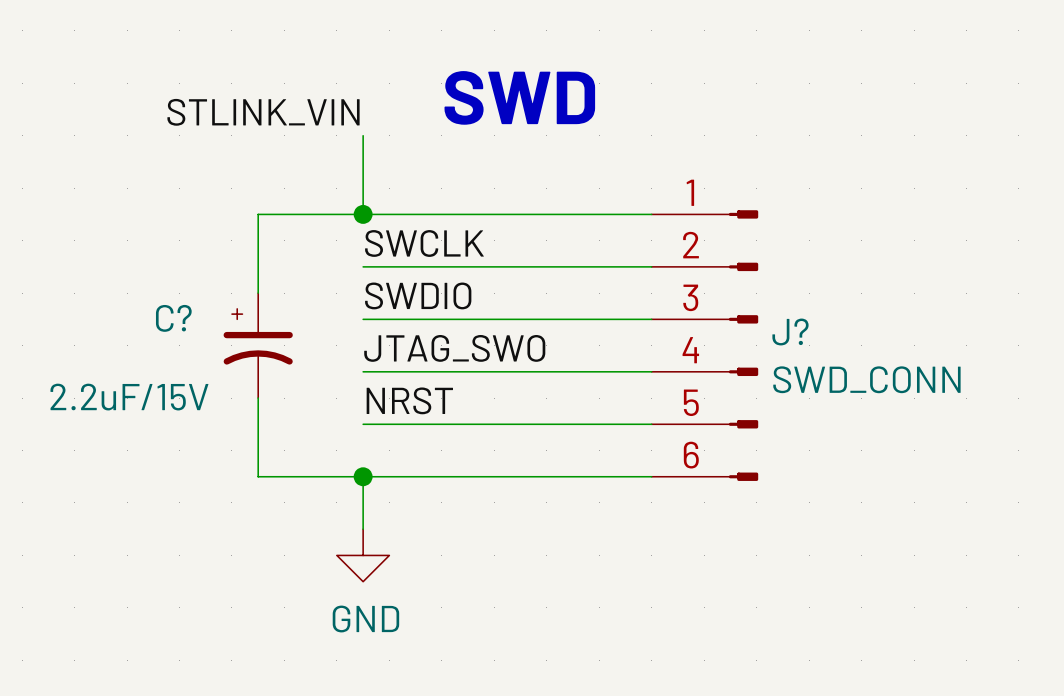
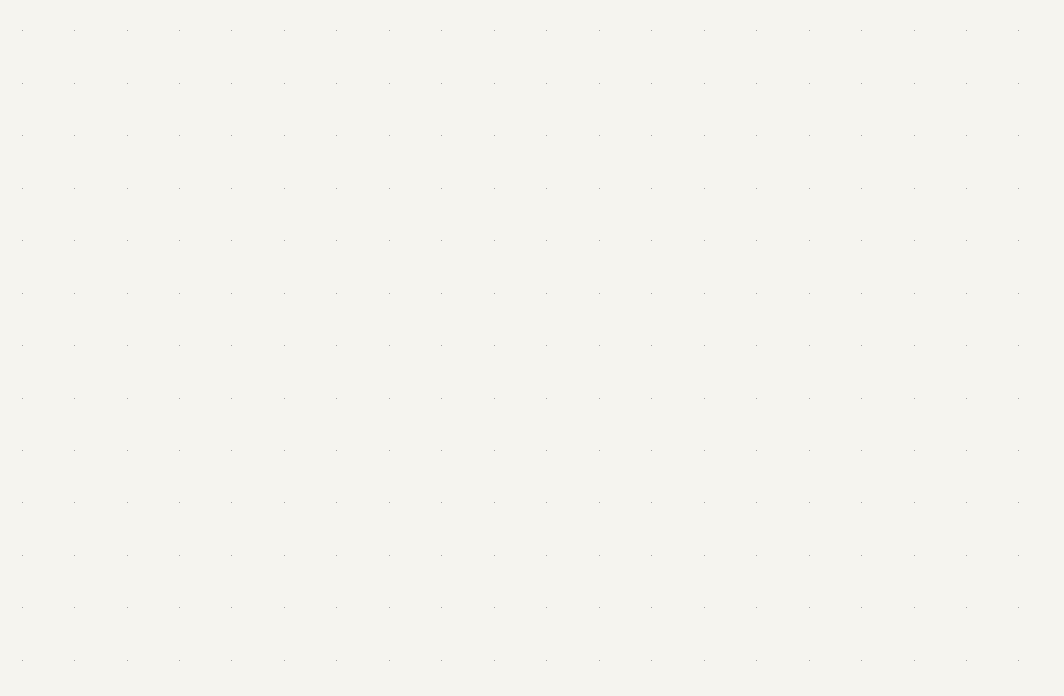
text: SWD (519, 97) -> none
label: STLINK_VIN (263, 112) -> none
wire: (363, 135) (363, 214) -> none
junction: (363, 214) -> none
wire: (651, 214) (258, 214) (258, 293) -> none
label: SWCLK (424, 243) -> none
wire: (363, 266) (651, 266) -> none
label: SWDIO (418, 295) -> none
wire: (363, 319) (651, 319) -> none
C?: 2.2uF/15V (258, 345) -> none
J?: SWD_CONN (704, 345) -> none
label: JTAG_SWO (454, 348) -> none
wire: (363, 371) (651, 371) -> none
wire: (258, 398) (258, 476) (651, 476) -> none
label: NRST (409, 400) -> none
wire: (363, 424) (651, 424) -> none
wire: (363, 476) (363, 529) -> none
junction: (363, 476) -> none
power symbol: GND (363, 555) -> none

